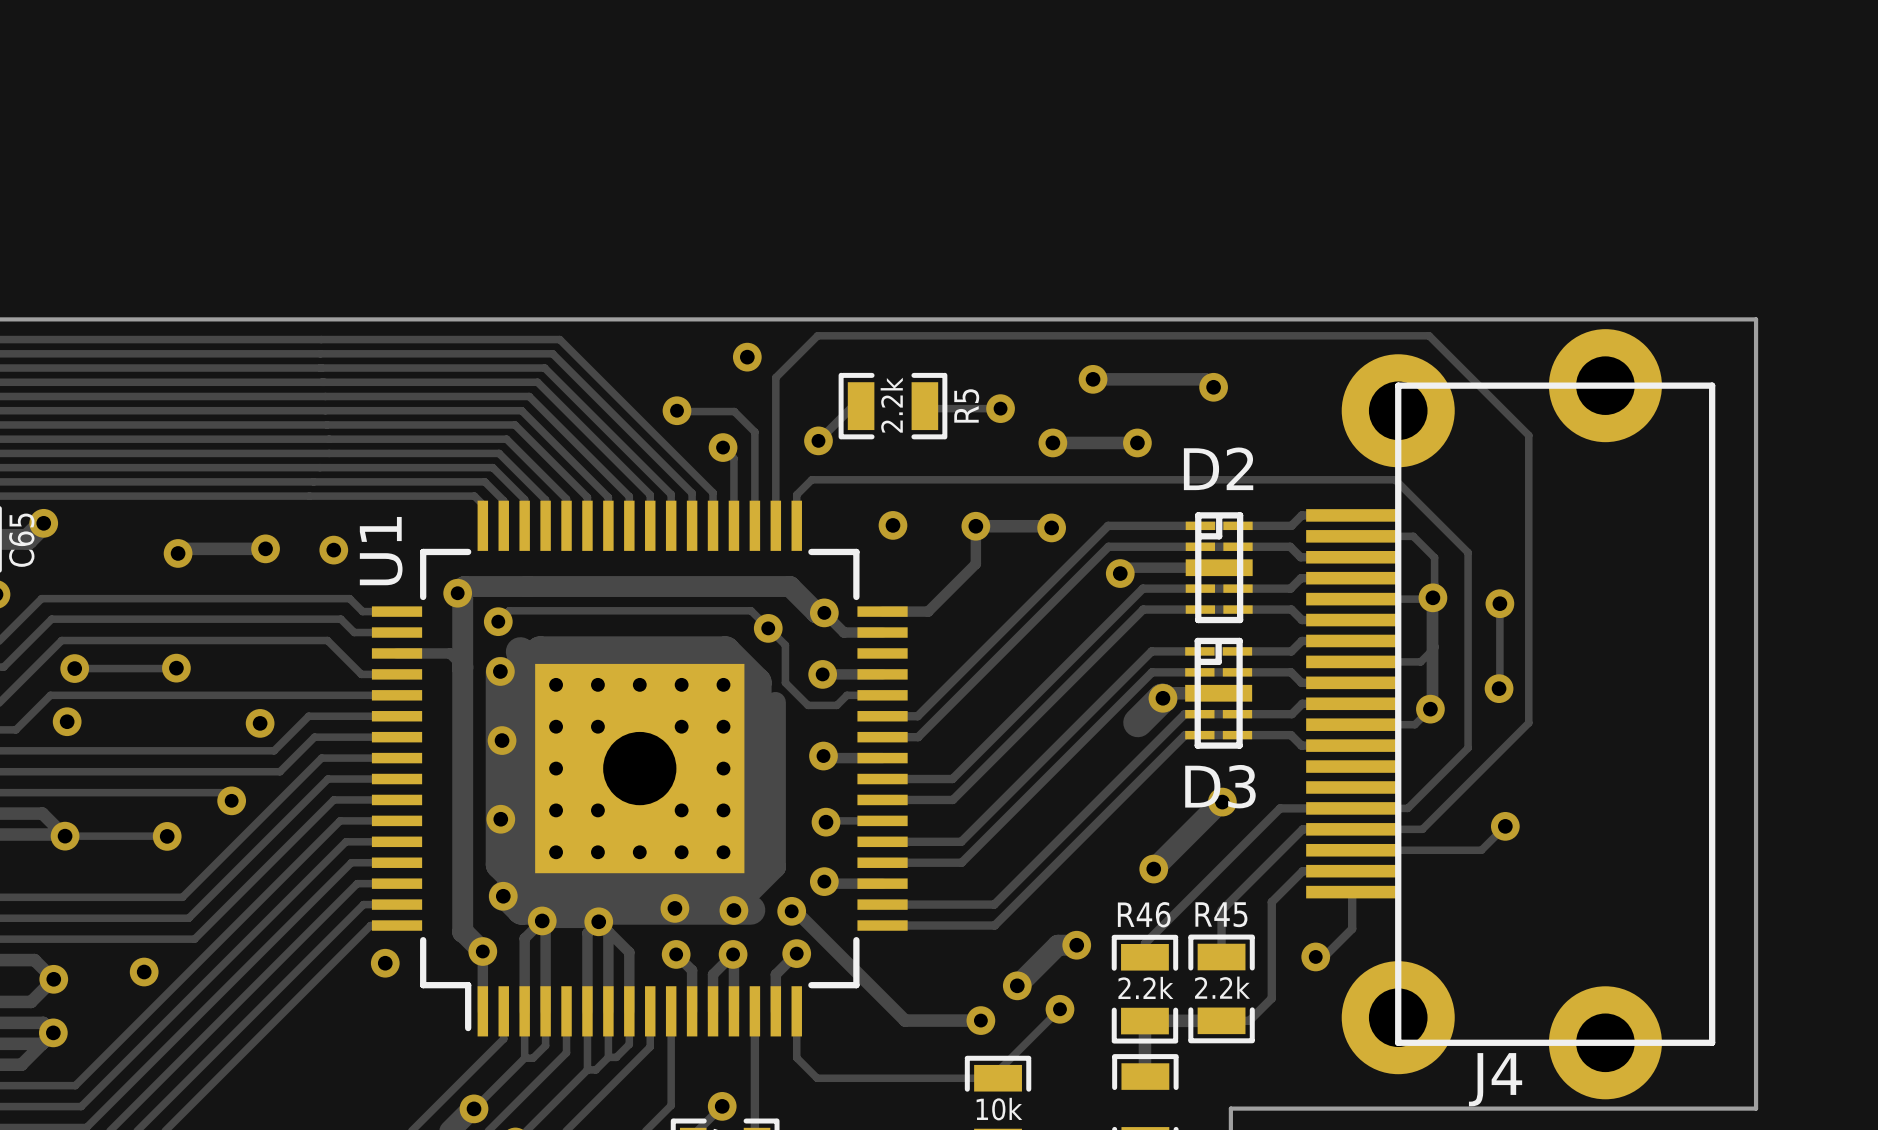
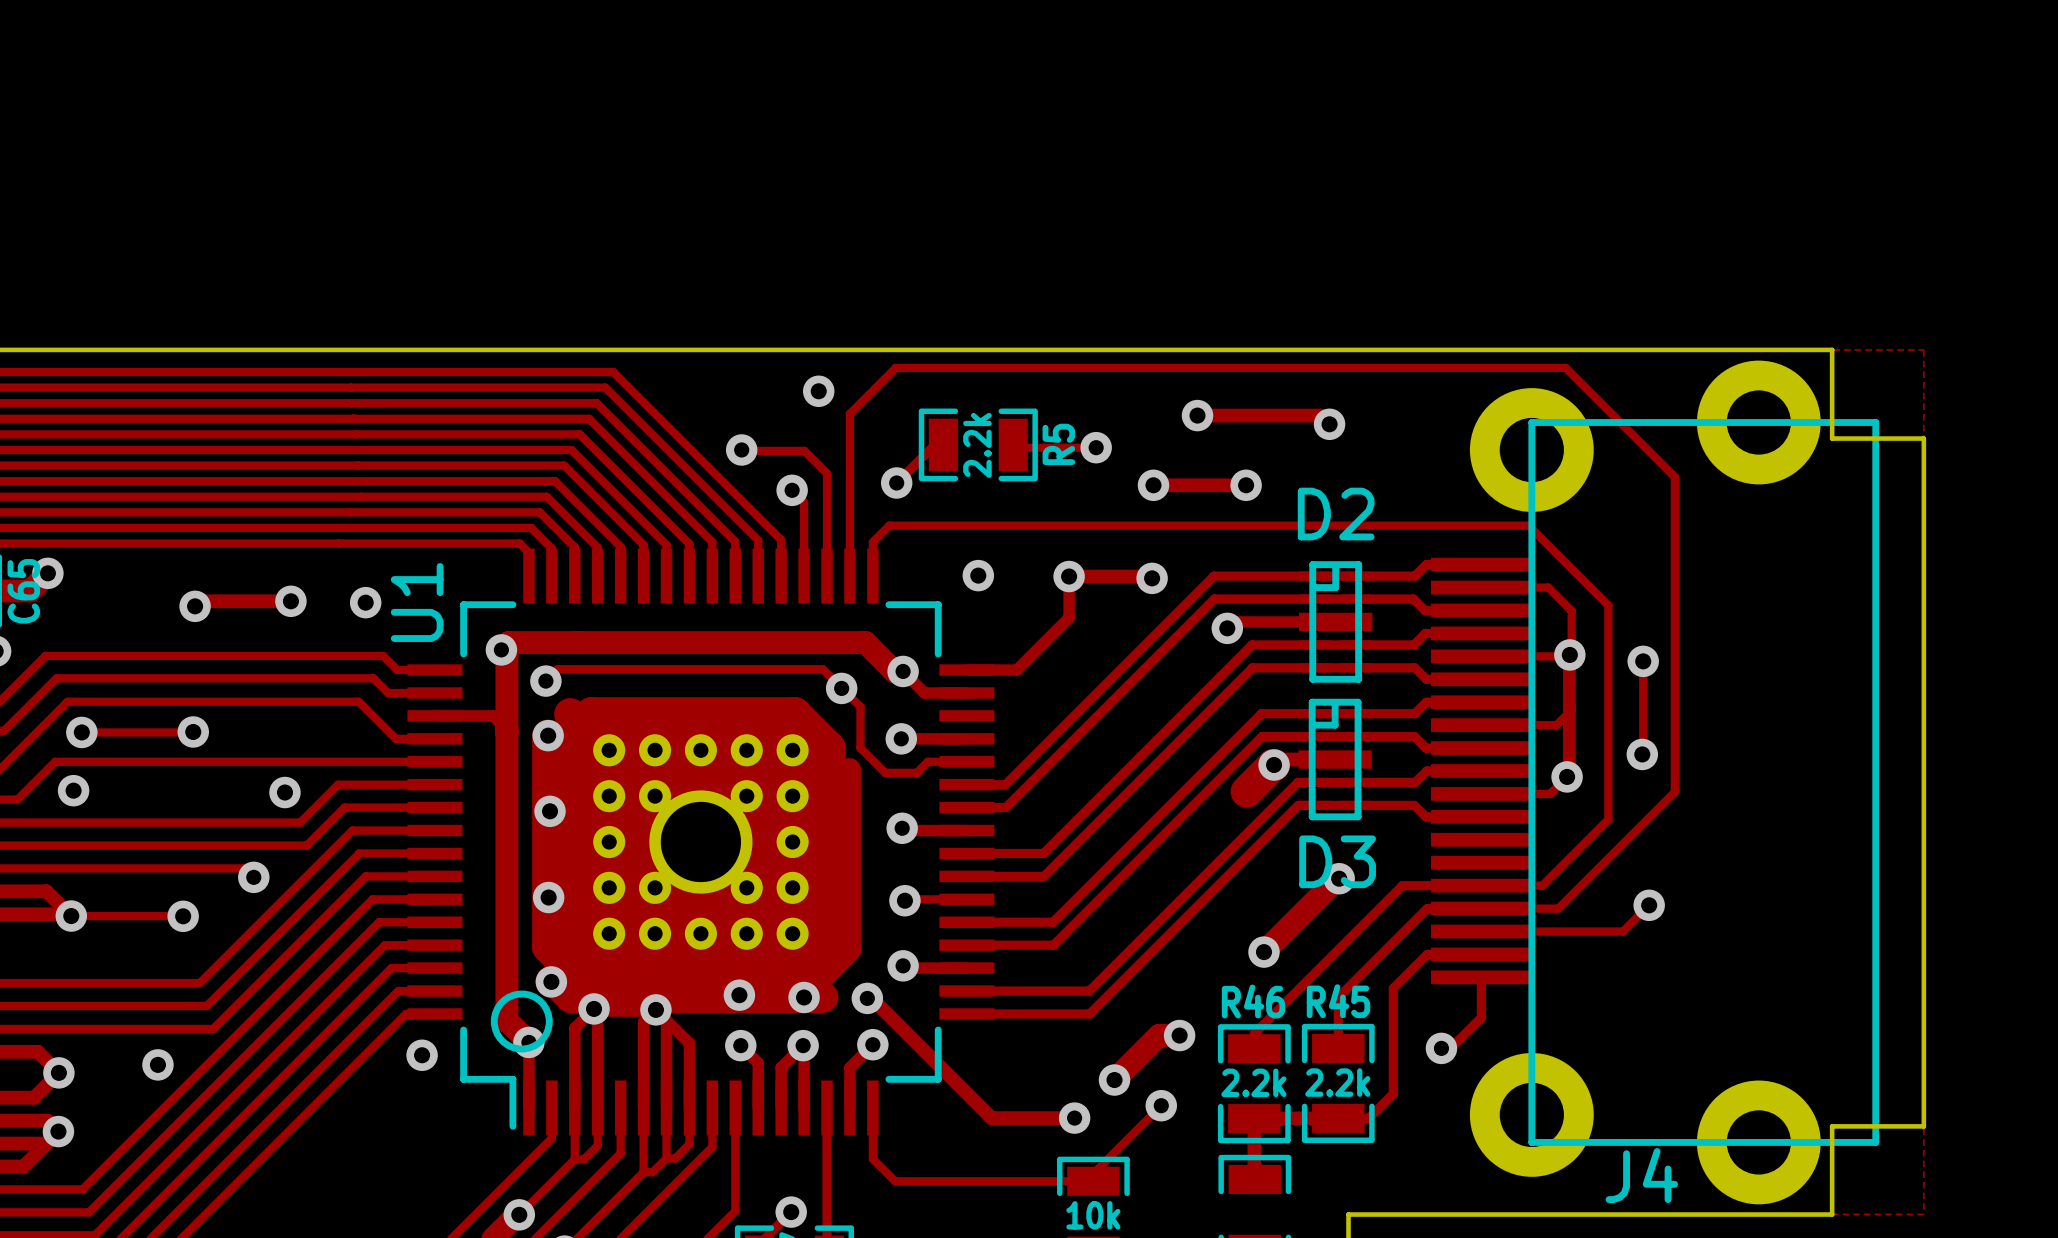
board edge: (1672, 319) (1756, 319) (1756, 400) -> (1832, 349) (1832, 438) (1923, 438)
U1 footprint: [371, 500, 908, 1037] -> [407, 548, 995, 1136]
board edge: (1756, 1028) (1756, 1108) (1672, 1108) -> (1923, 1126) (1832, 1126) (1832, 1214)

